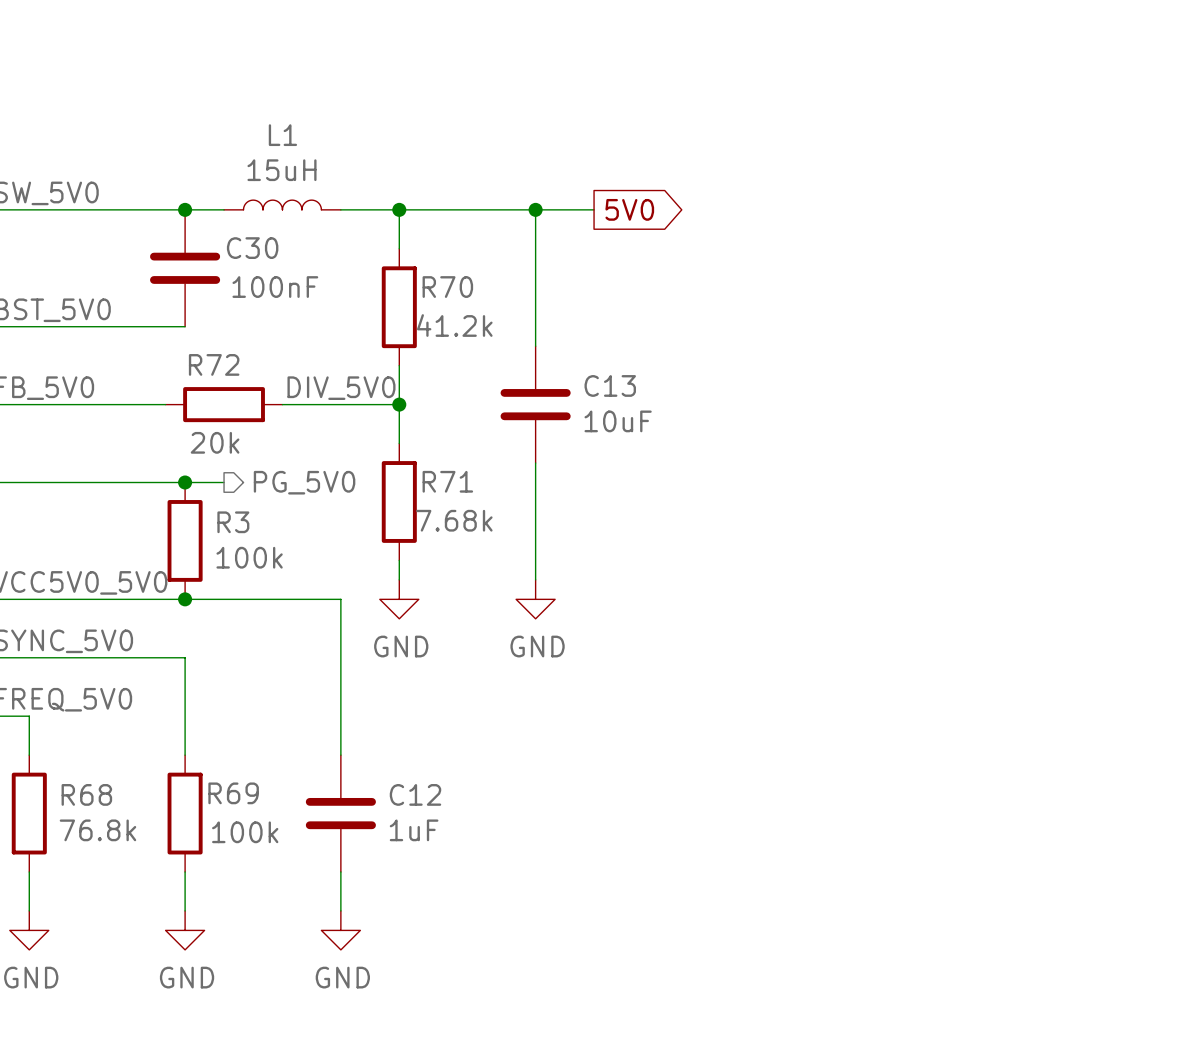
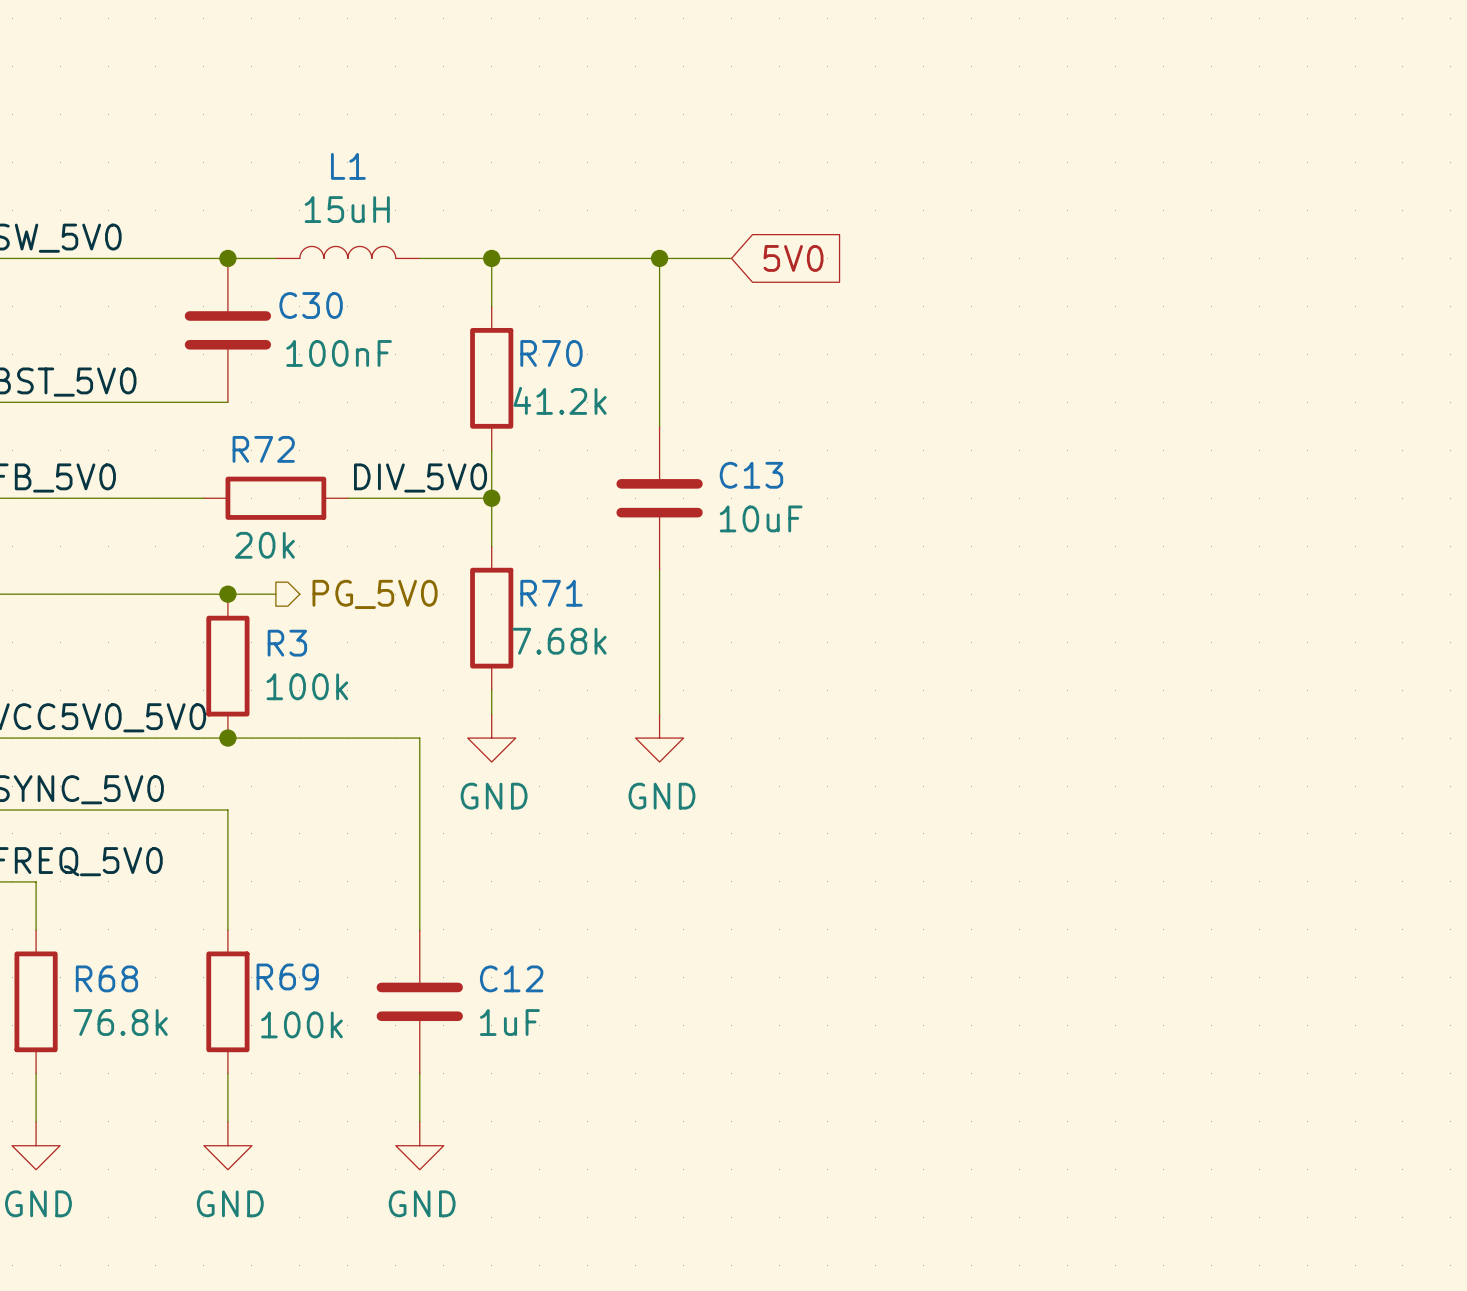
global label shape: output (629, 209) -> input (793, 258)

